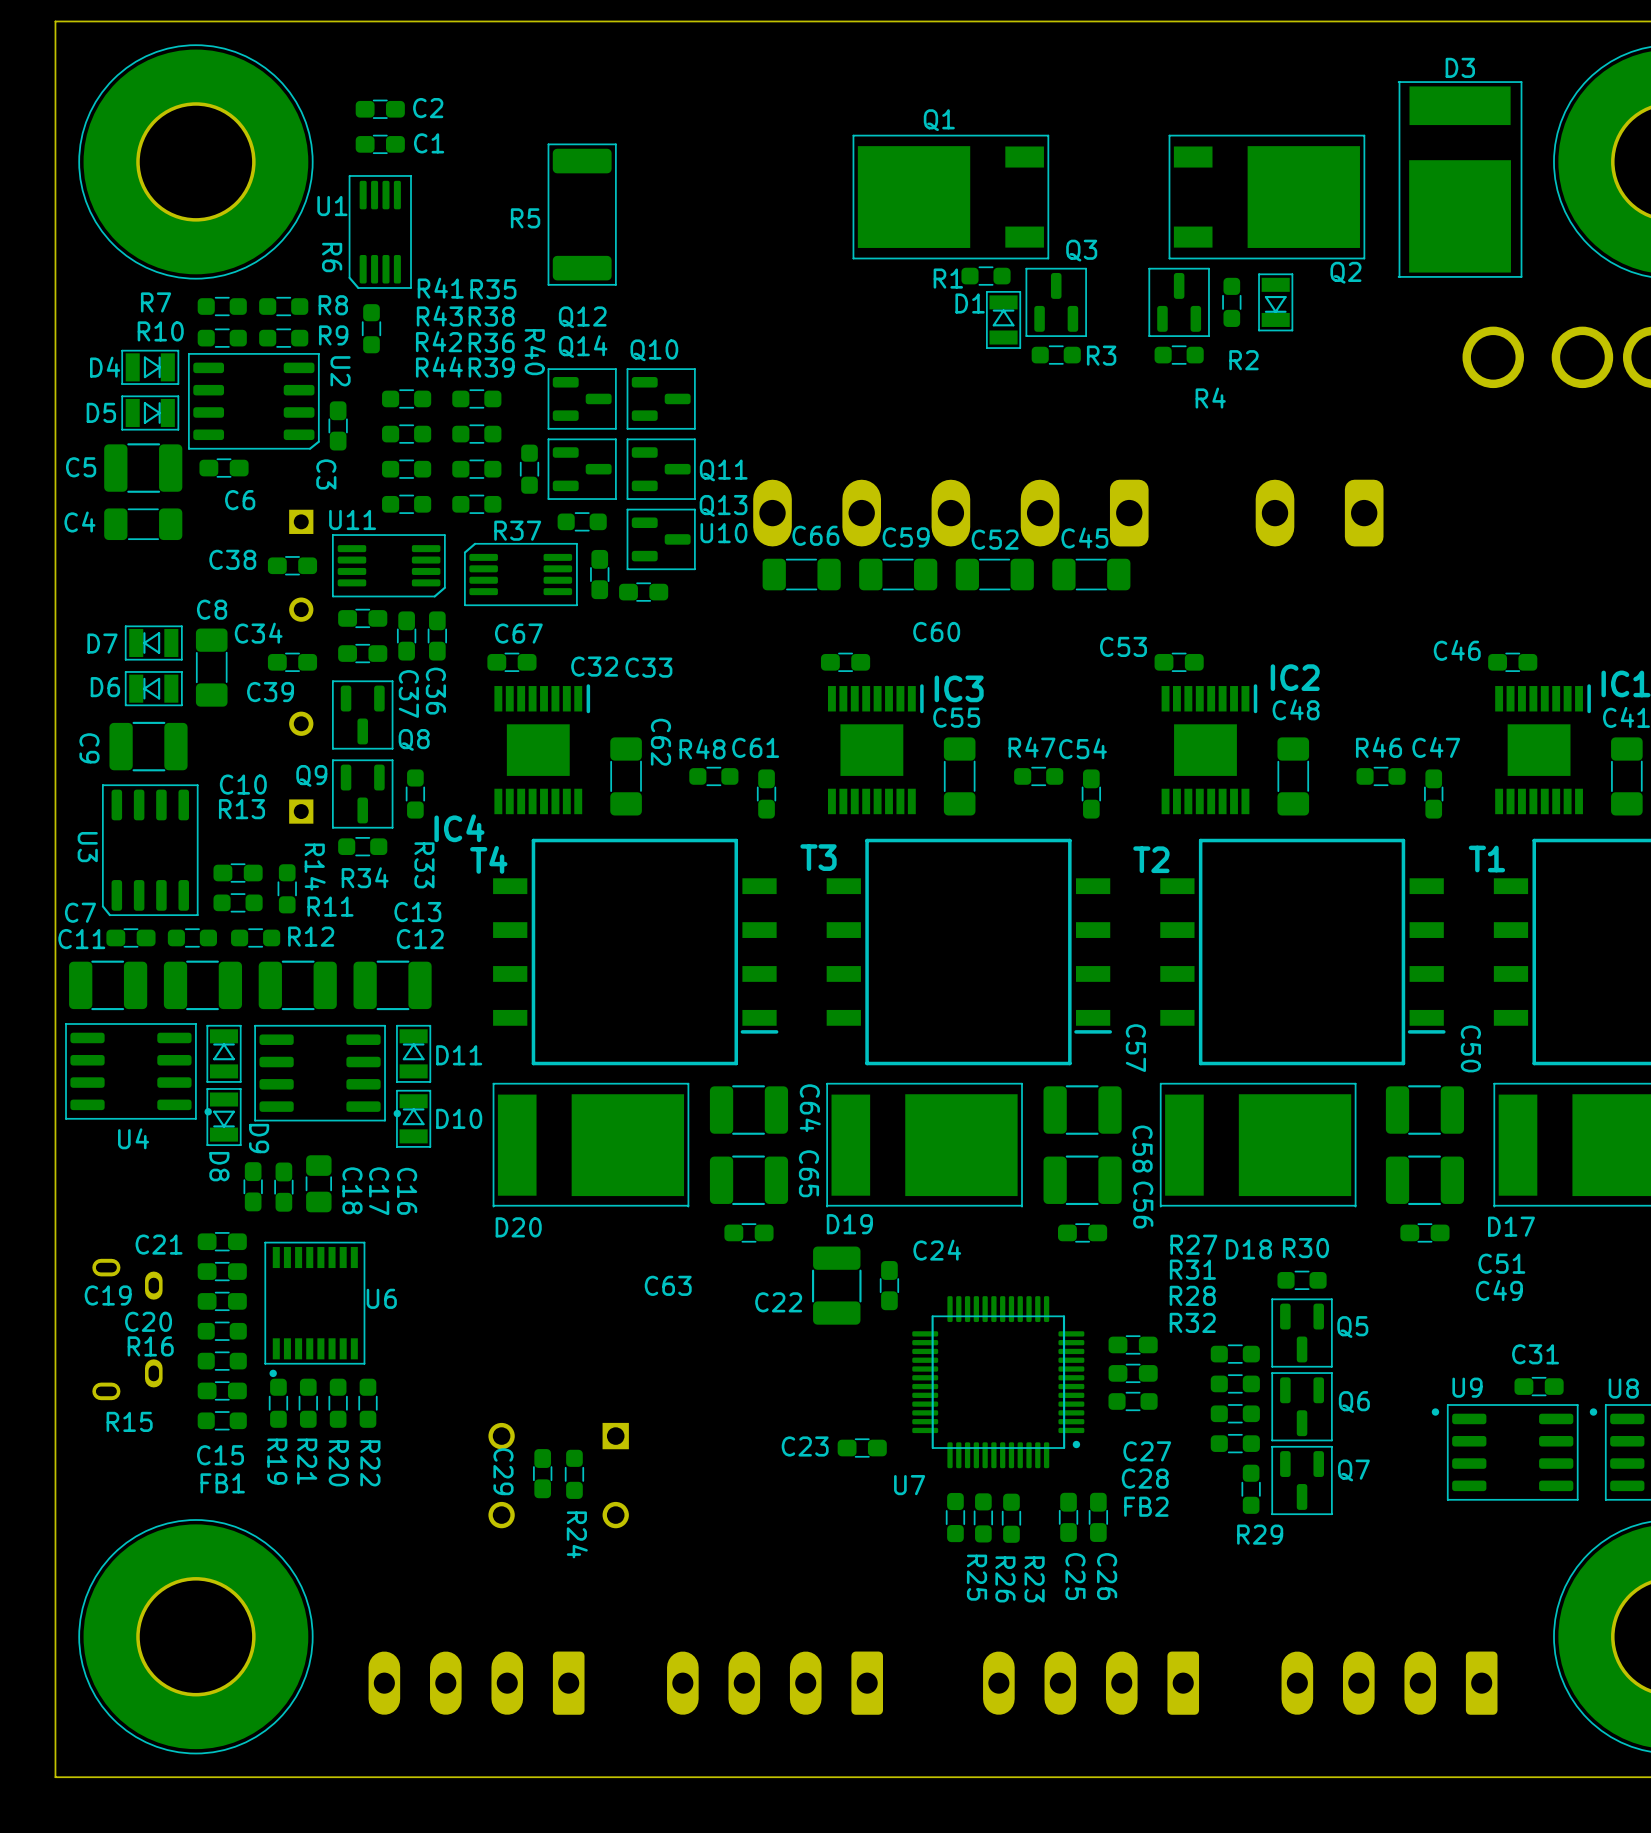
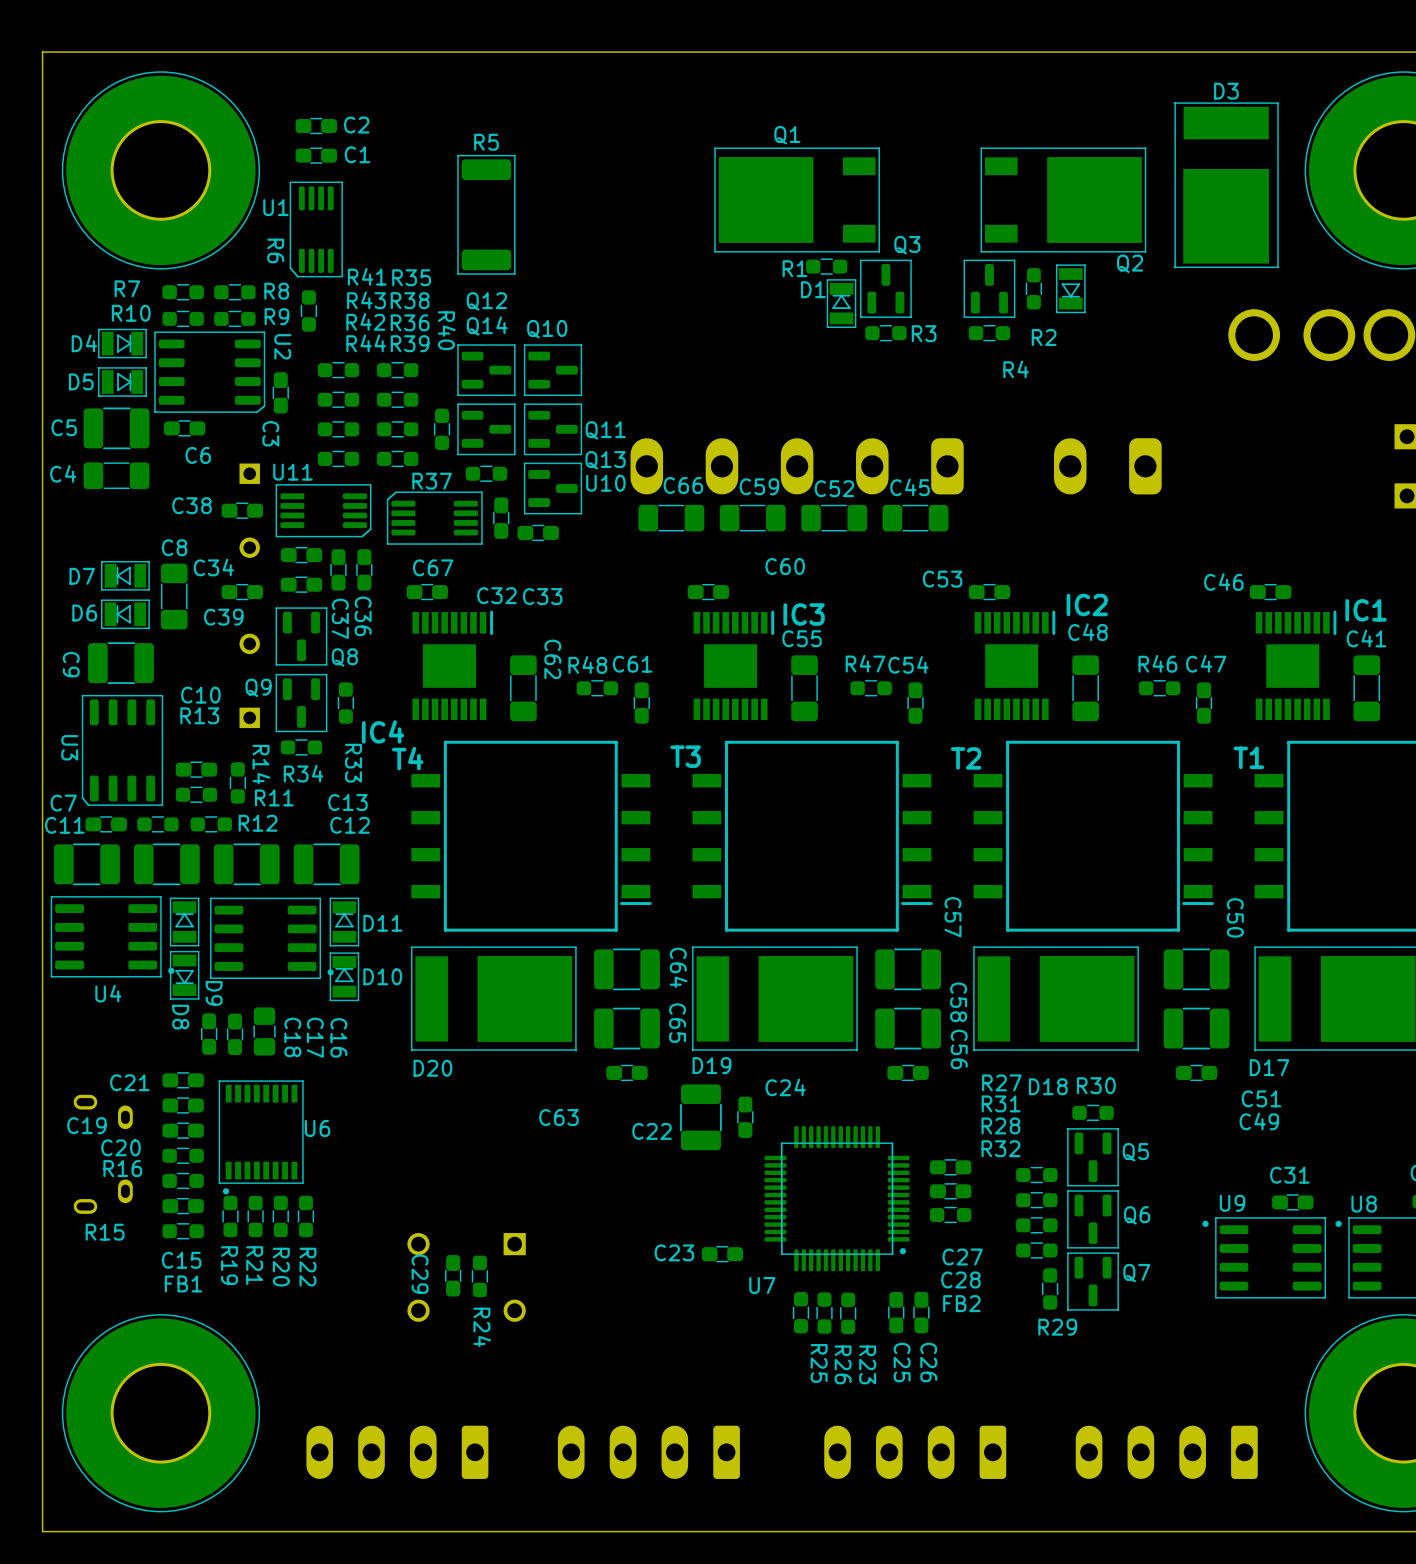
R5 name position: R5 (525, 218) -> R5 (486, 142)

